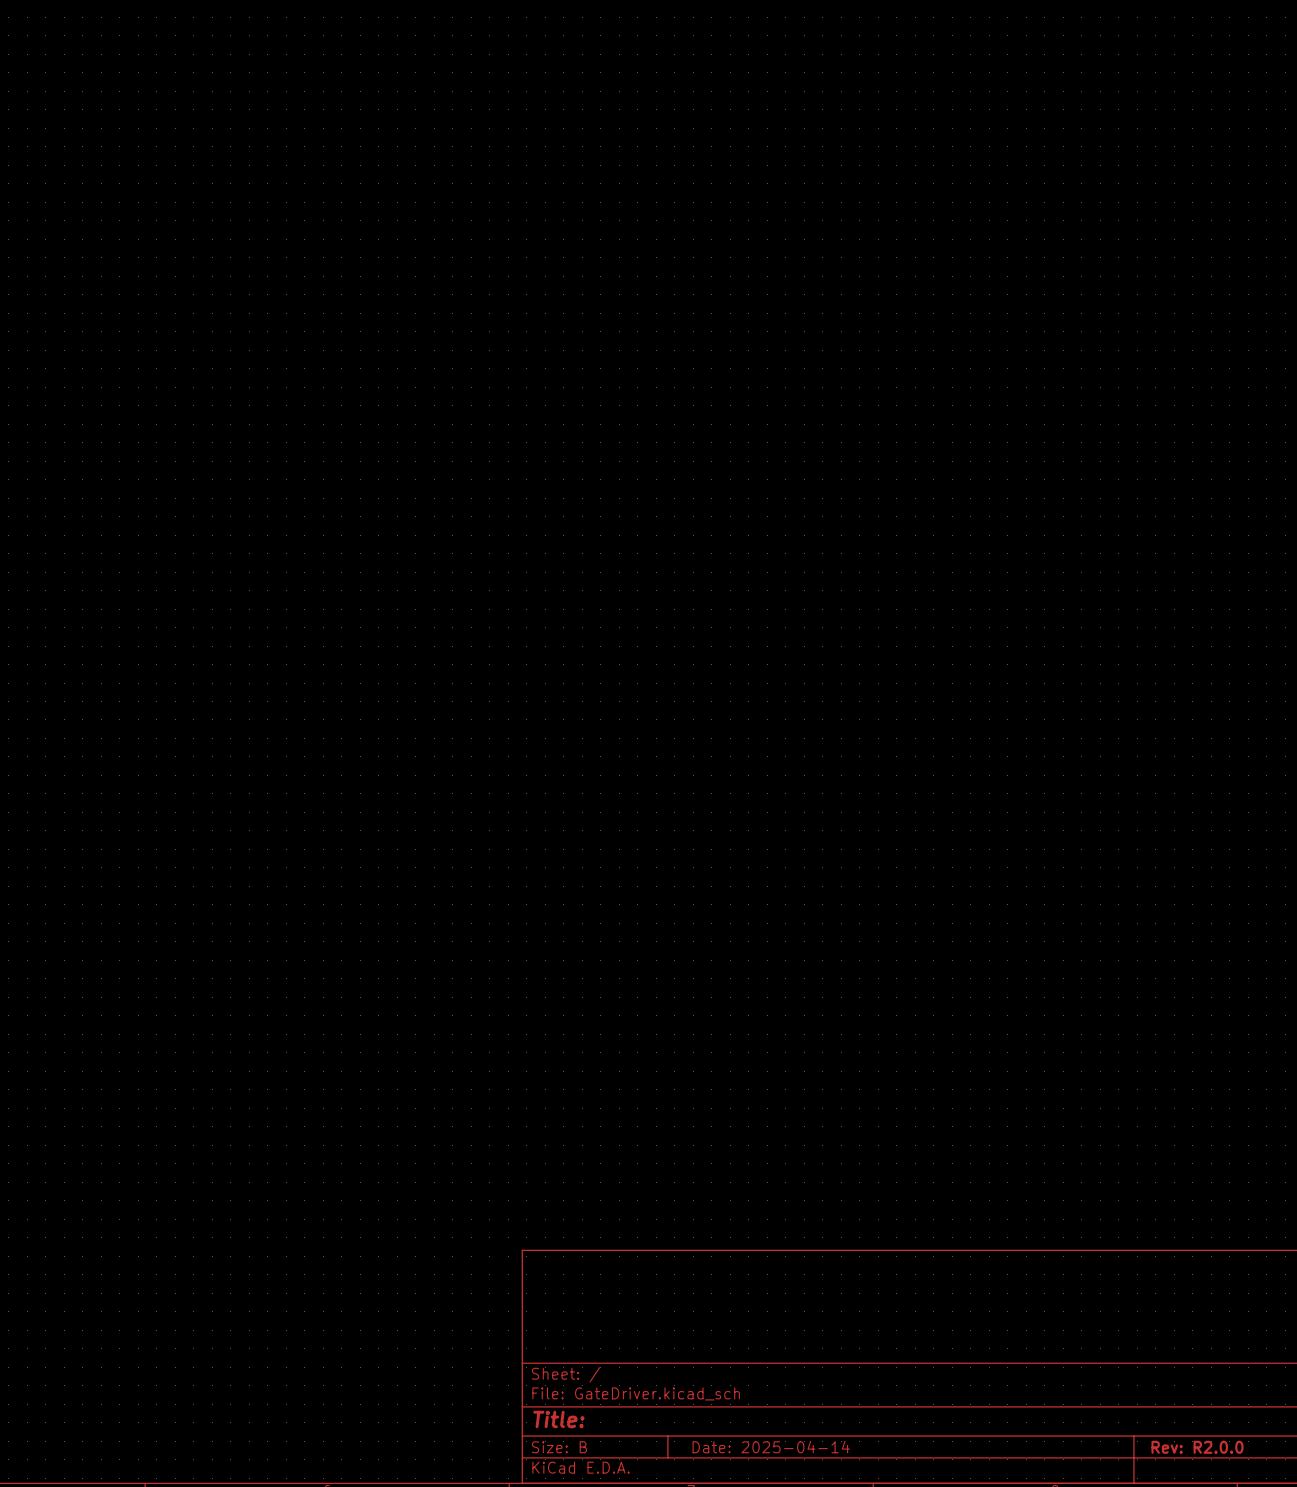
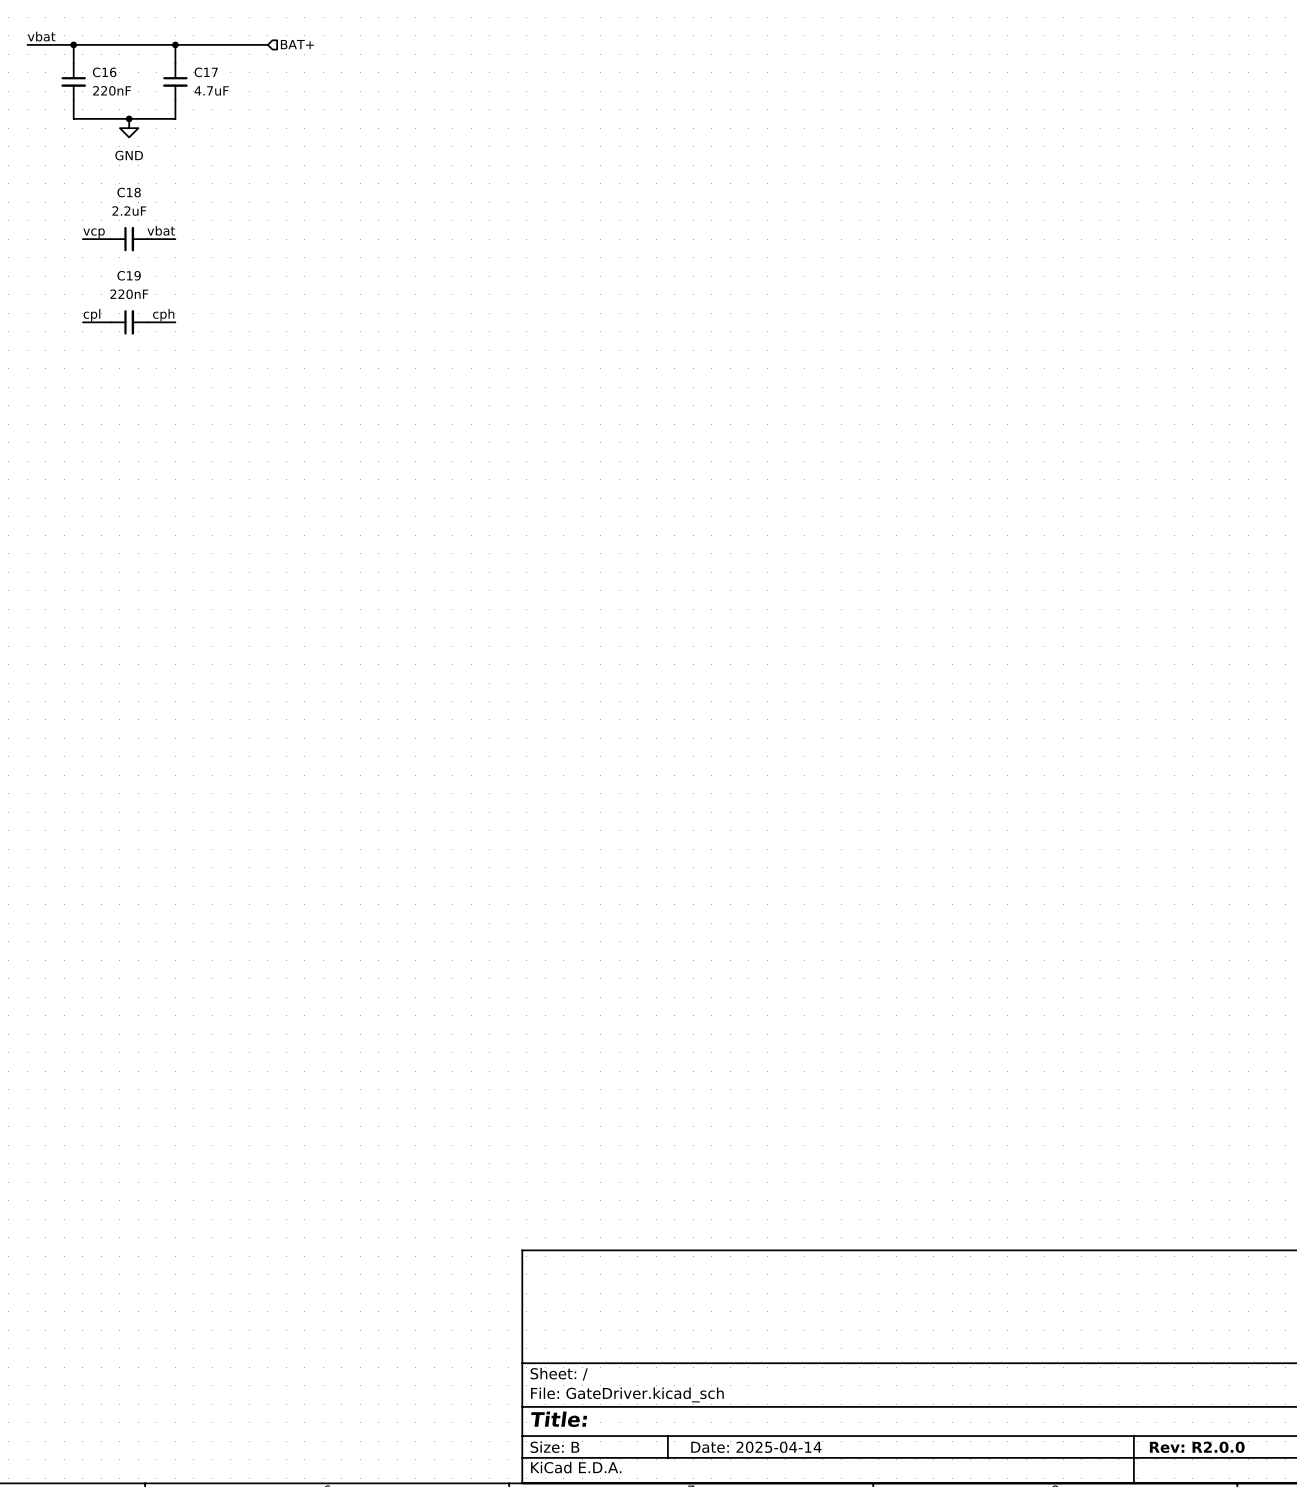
label: none -> vbat (41, 36)
wire: none -> (27, 44) (267, 44)
wire: none -> (73, 44) (73, 63)
junction: none -> (73, 44)
wire: none -> (175, 44) (175, 63)
junction: none -> (175, 44)
hierarchical label: none -> BAT+ (297, 44)
C16: none -> 220nF (73, 81)
C17: none -> 4.7uF (175, 81)
wire: none -> (73, 100) (73, 118) (175, 118) (175, 100)
junction: none -> (129, 118)
power symbol: none -> GND (129, 128)
label: none -> vbat (161, 230)
label: none -> vcp (94, 233)
wire: none -> (82, 239) (110, 239)
C18: none -> 2.2uF (129, 239)
wire: none -> (147, 239) (175, 239)
label: none -> cpl (91, 315)
label: none -> cph (163, 315)
wire: none -> (82, 322) (110, 322)
C19: none -> 220nF (129, 322)
wire: none -> (147, 322) (175, 322)

